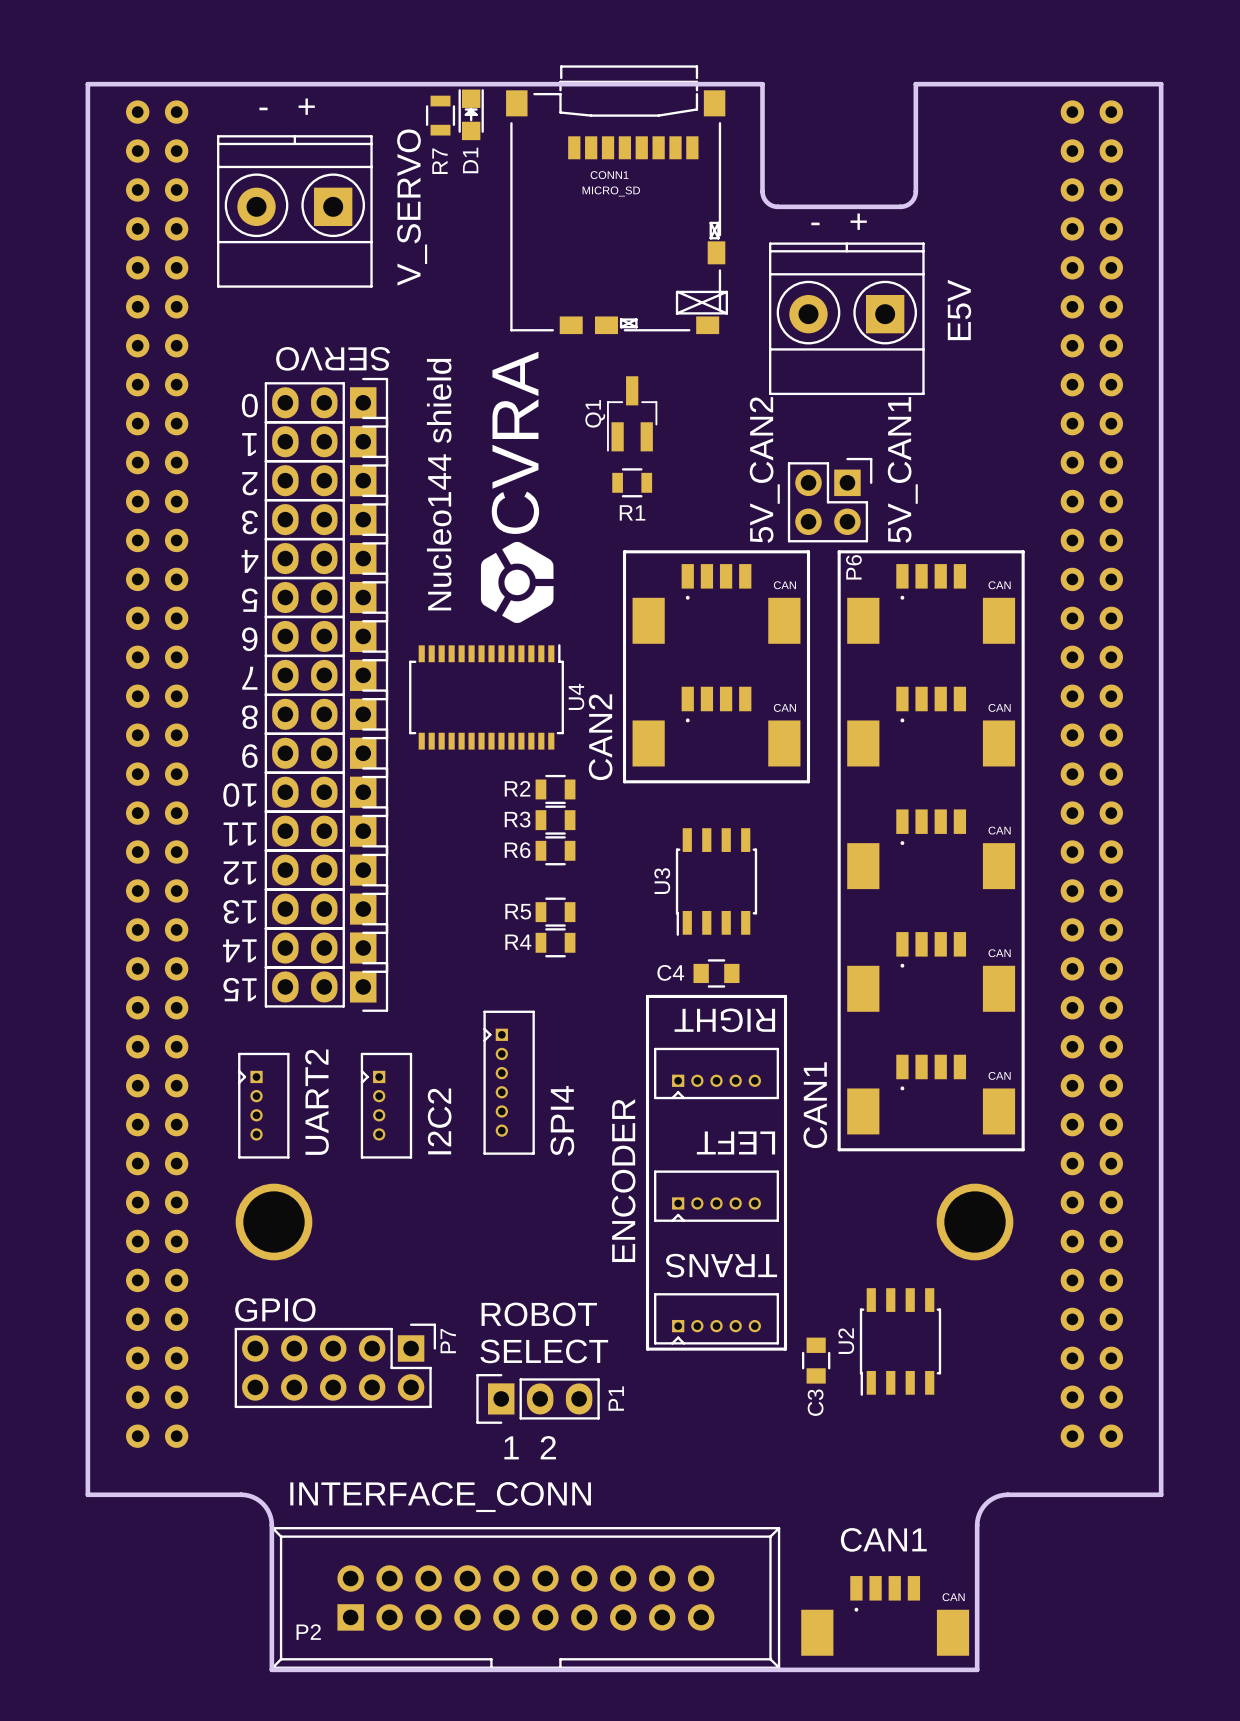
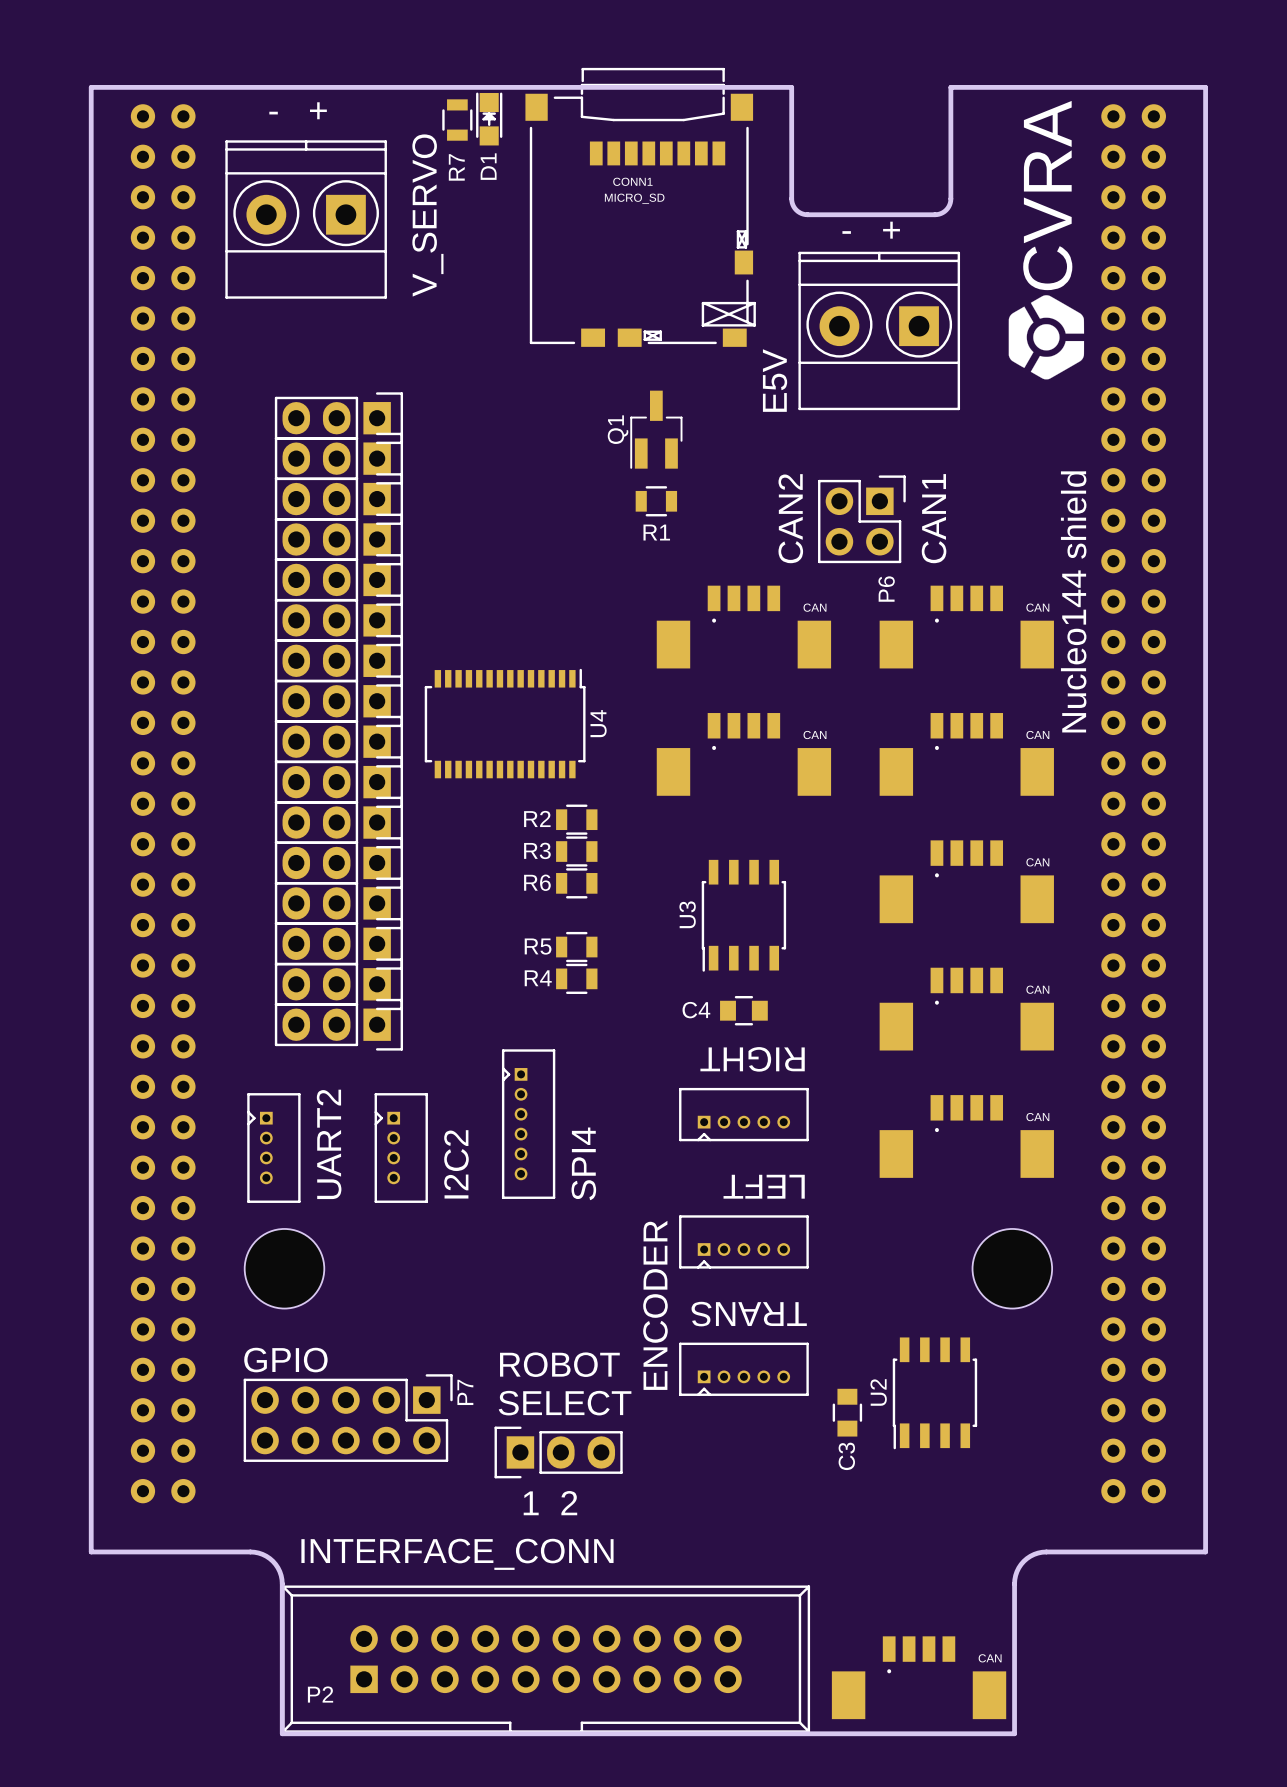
text: none -> CVRA (1047, 195)
drawing: none -> [1008, 295, 1085, 380]
text position: E5V (959, 309) -> E5V (775, 380)
text: SERVO (333, 358) -> none
text: 0 (249, 405) -> none
text: CVRA (515, 442) -> none
text: 1 (249, 444) -> none
text: 5V_CAN2 (764, 469) -> CAN2 (790, 518)
text: 5V_CAN1 (902, 469) -> CAN1 (934, 518)
text: 2 (249, 483) -> none
text: Nucleo144 shield (439, 484) -> none
text: 3 (249, 522) -> none
drawing: [480, 541, 554, 624] -> none
line: (624, 551) (808, 551) (808, 781) (624, 781) (624, 551) -> none
line: (839, 551) (1023, 551) (1023, 1149) (839, 1149) (839, 551) -> none
text: 4 (249, 561) -> none
text: none -> Nucleo144 shield (1073, 601)
text: 5 (249, 600) -> none
text: 6 (249, 639) -> none
text: 7 (249, 678) -> none
text: 8 (249, 717) -> none
text: CAN2 (600, 737) -> none
text: 9 (249, 756) -> none
text: 10 (239, 795) -> none
text: 11 (240, 833) -> none
text: 12 (240, 873) -> none
text: 13 (240, 911) -> none
text: 14 (239, 950) -> none
text: 15 (240, 989) -> none
line: (647, 996) (647, 1349) (785, 1349) (785, 996) (647, 996) -> none
text: CAN1 (815, 1105) -> none
text position: ENCODER (623, 1180) -> ENCODER (655, 1305)
part footprint: [235, 1183, 313, 1261] -> [244, 1228, 325, 1309]
part footprint: [936, 1183, 1014, 1261] -> [972, 1228, 1053, 1309]
P1 name: P1 (616, 1398) -> none
text: CAN1 (883, 1539) -> none

